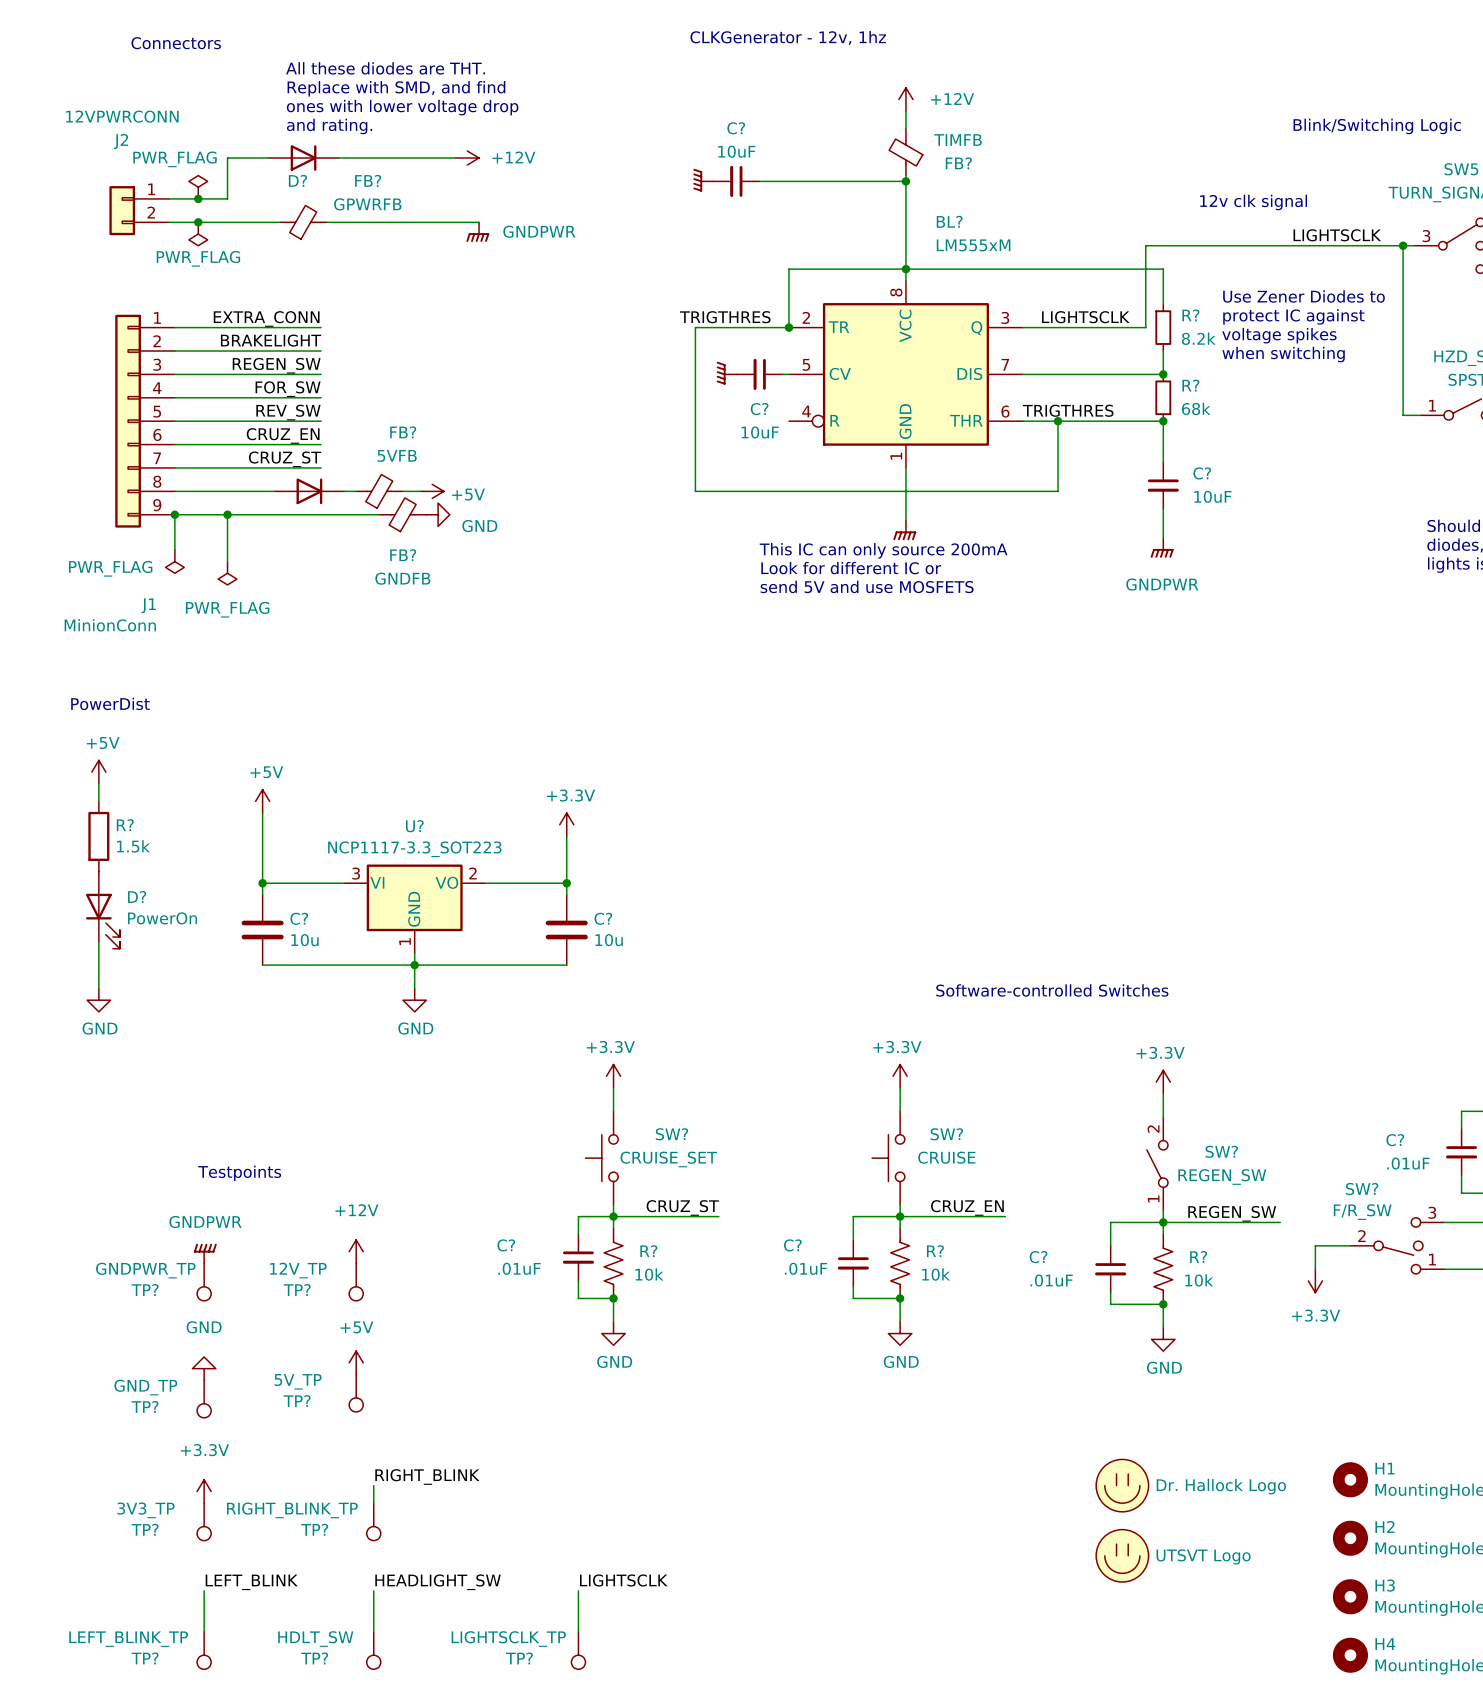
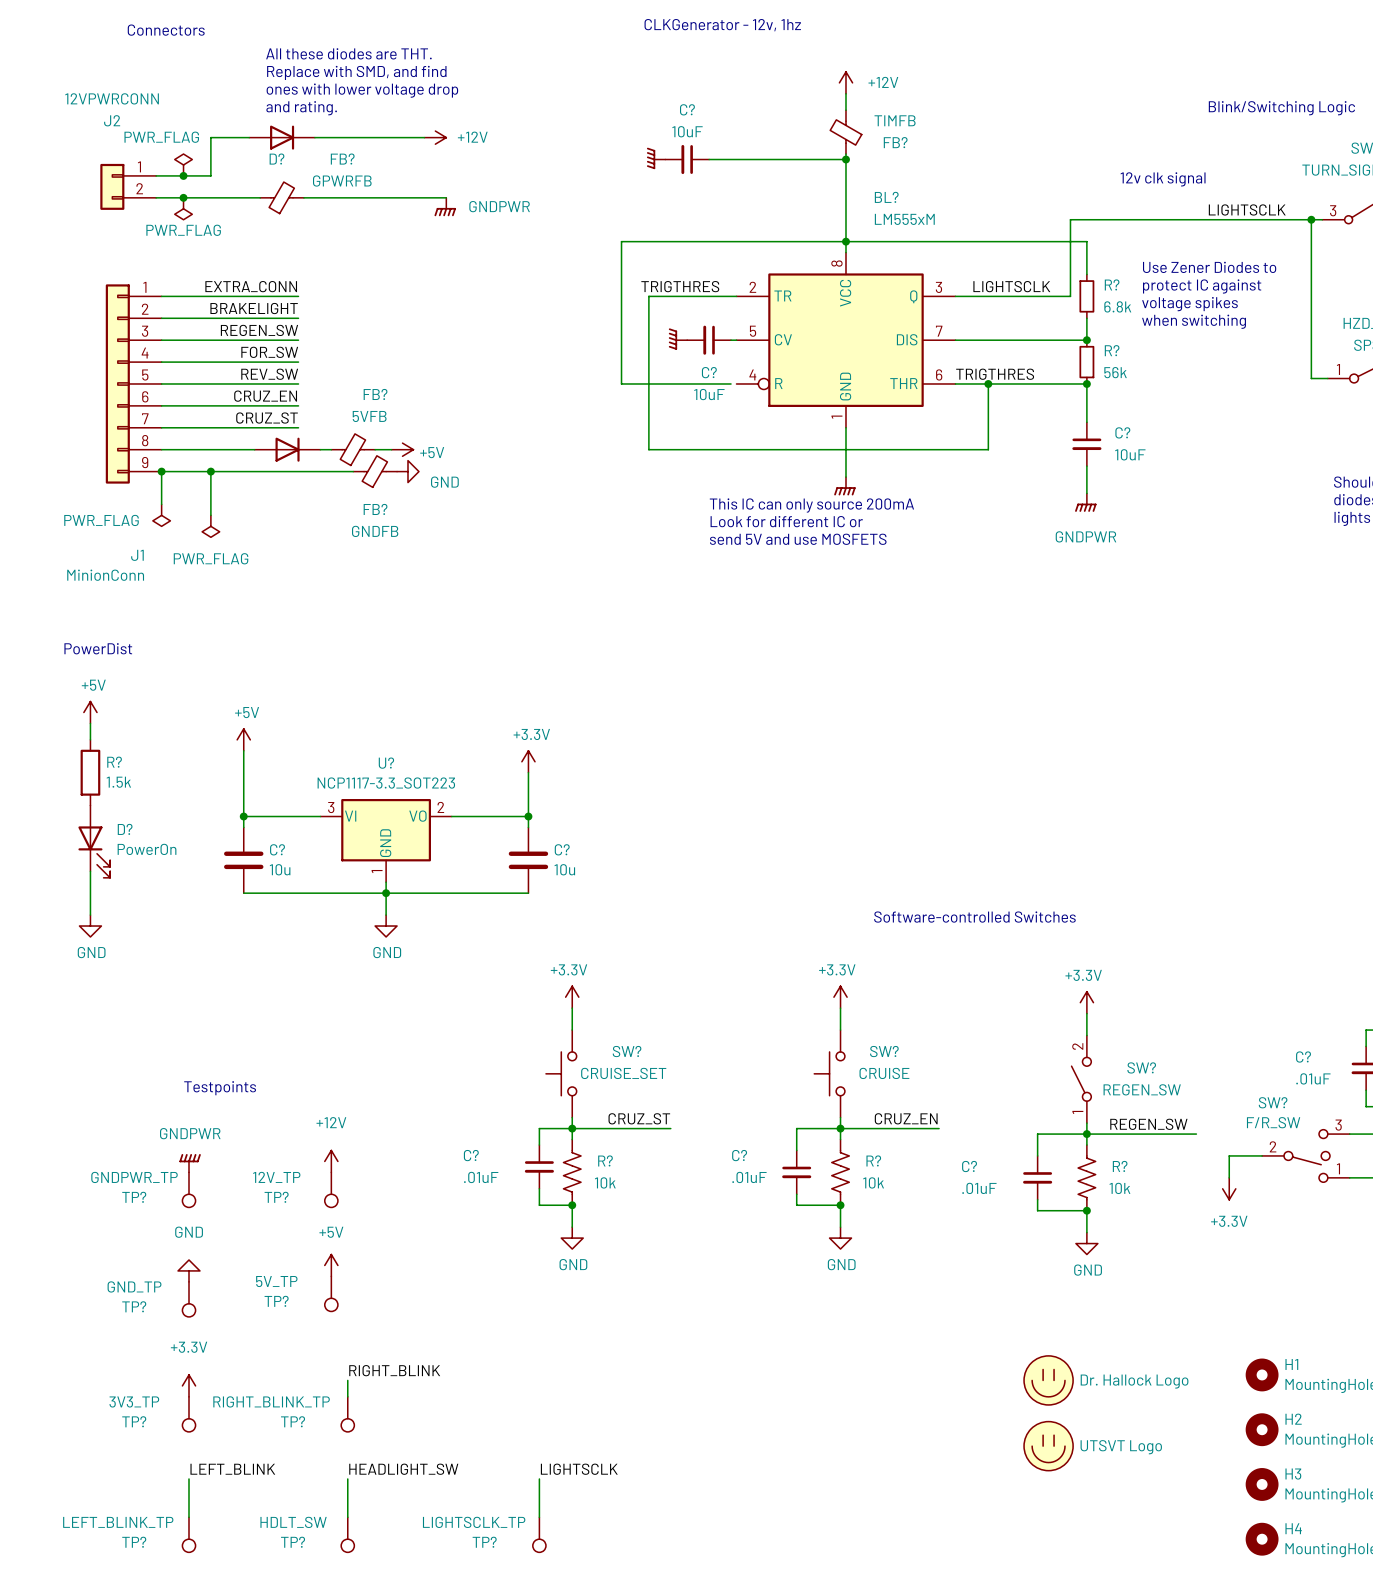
wire: (788, 269) (788, 327) -> (736, 241) (621, 241) (621, 383) (731, 383)
junction: (788, 327) -> none
R? value: 8.2k (1198, 338) -> 6.8k (1117, 306)
R? value: 68k (1196, 408) -> 56k (1115, 372)

